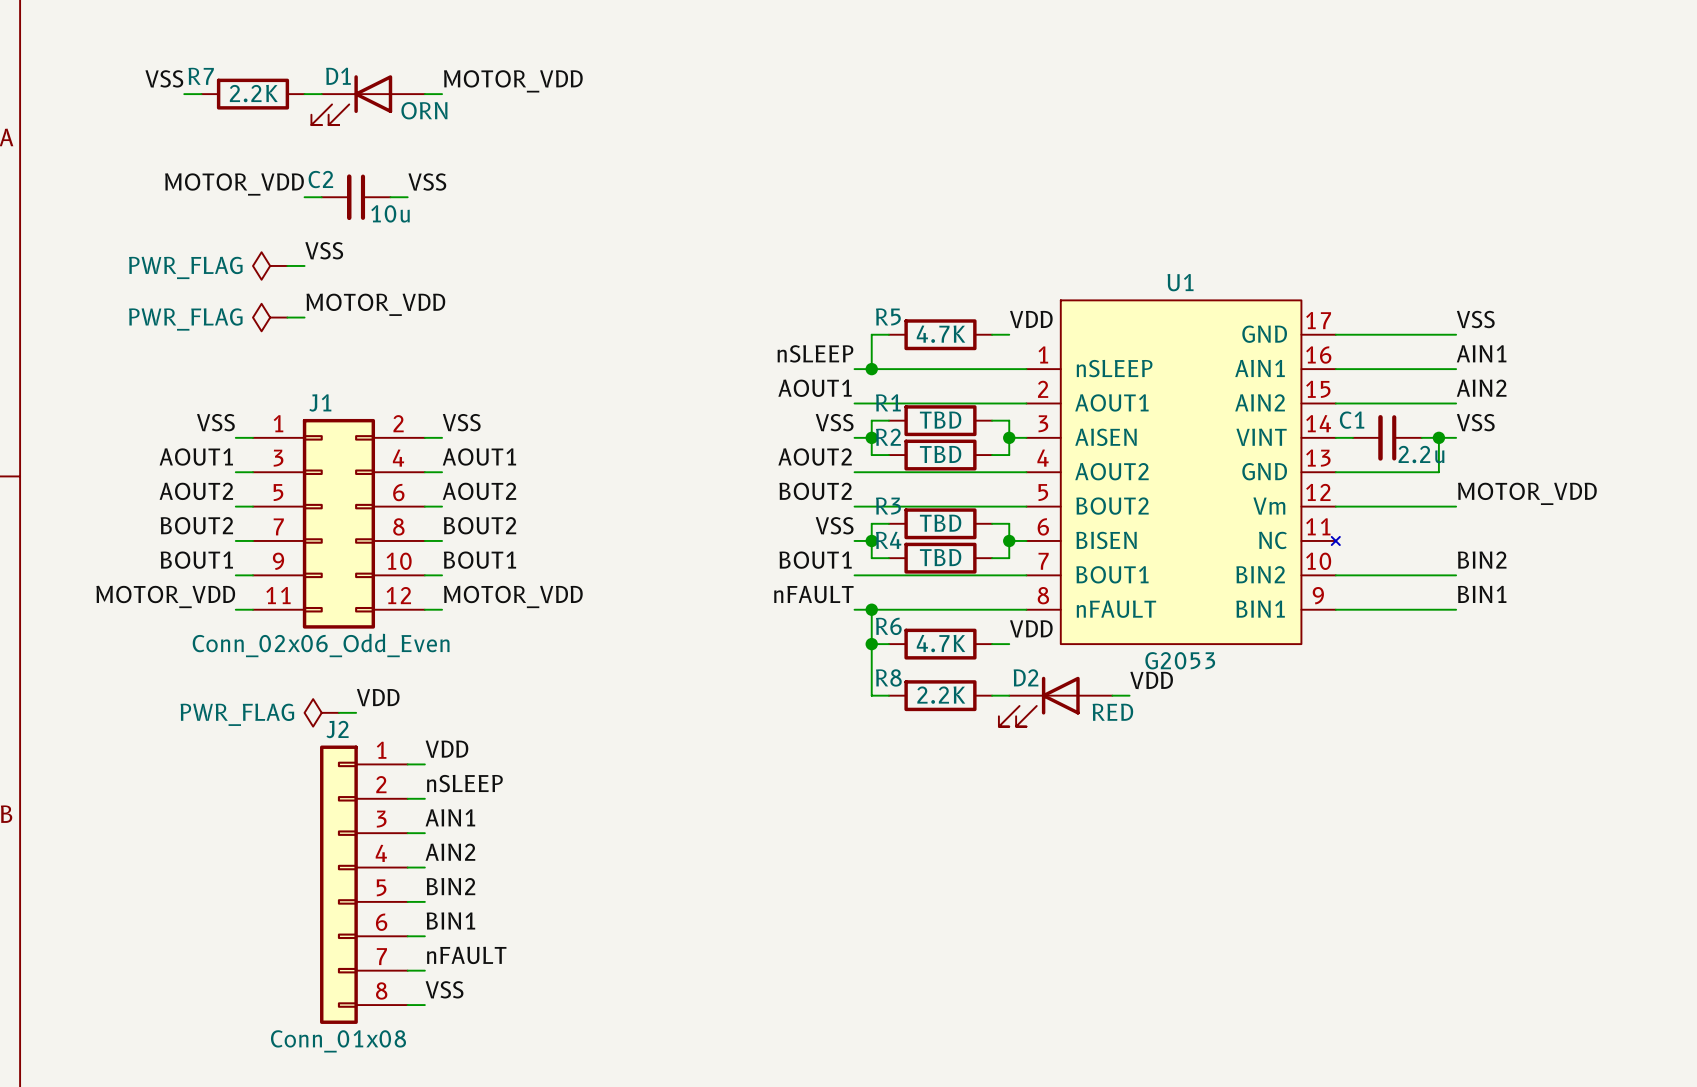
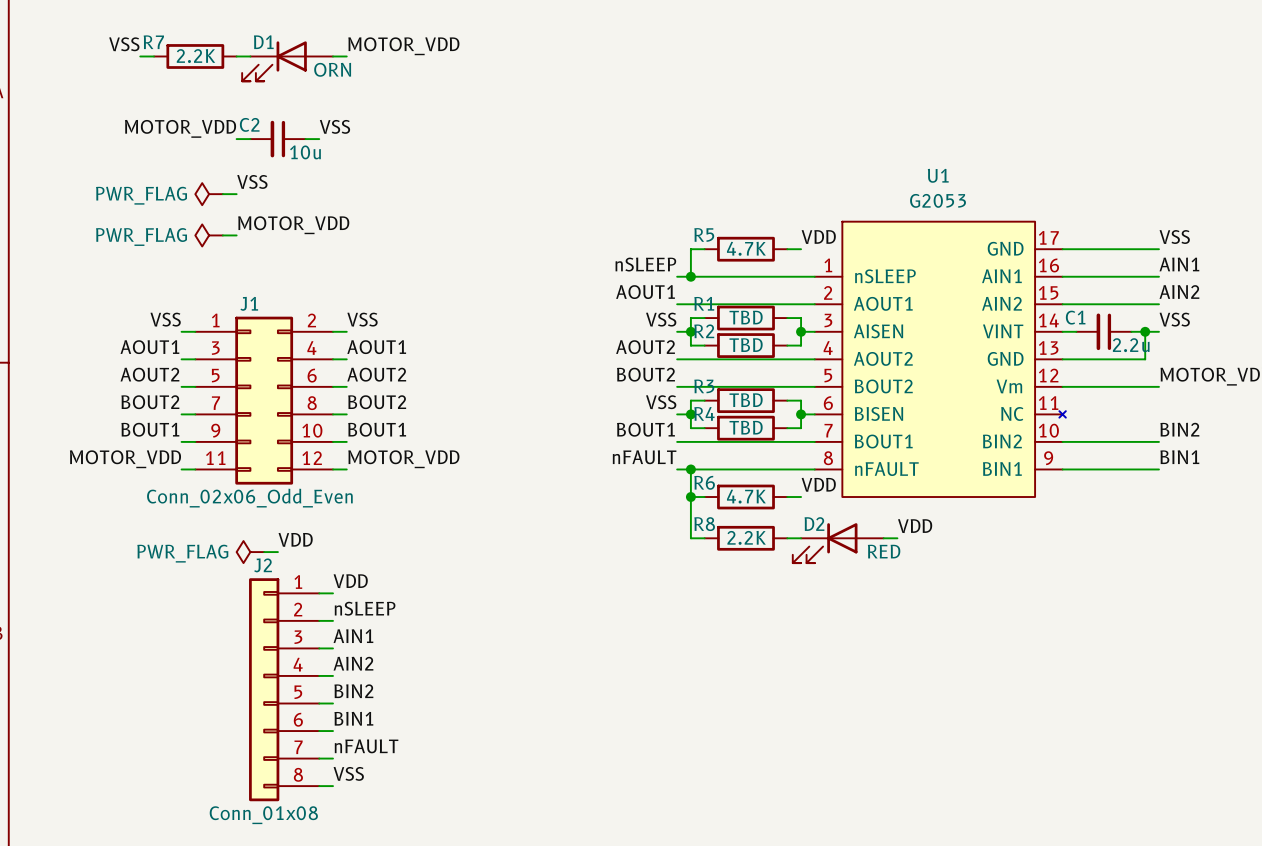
U1 name position: U1 (1180, 282) -> U1 (938, 175)
U1 value position: G2053 (1180, 660) -> G2053 (938, 200)

